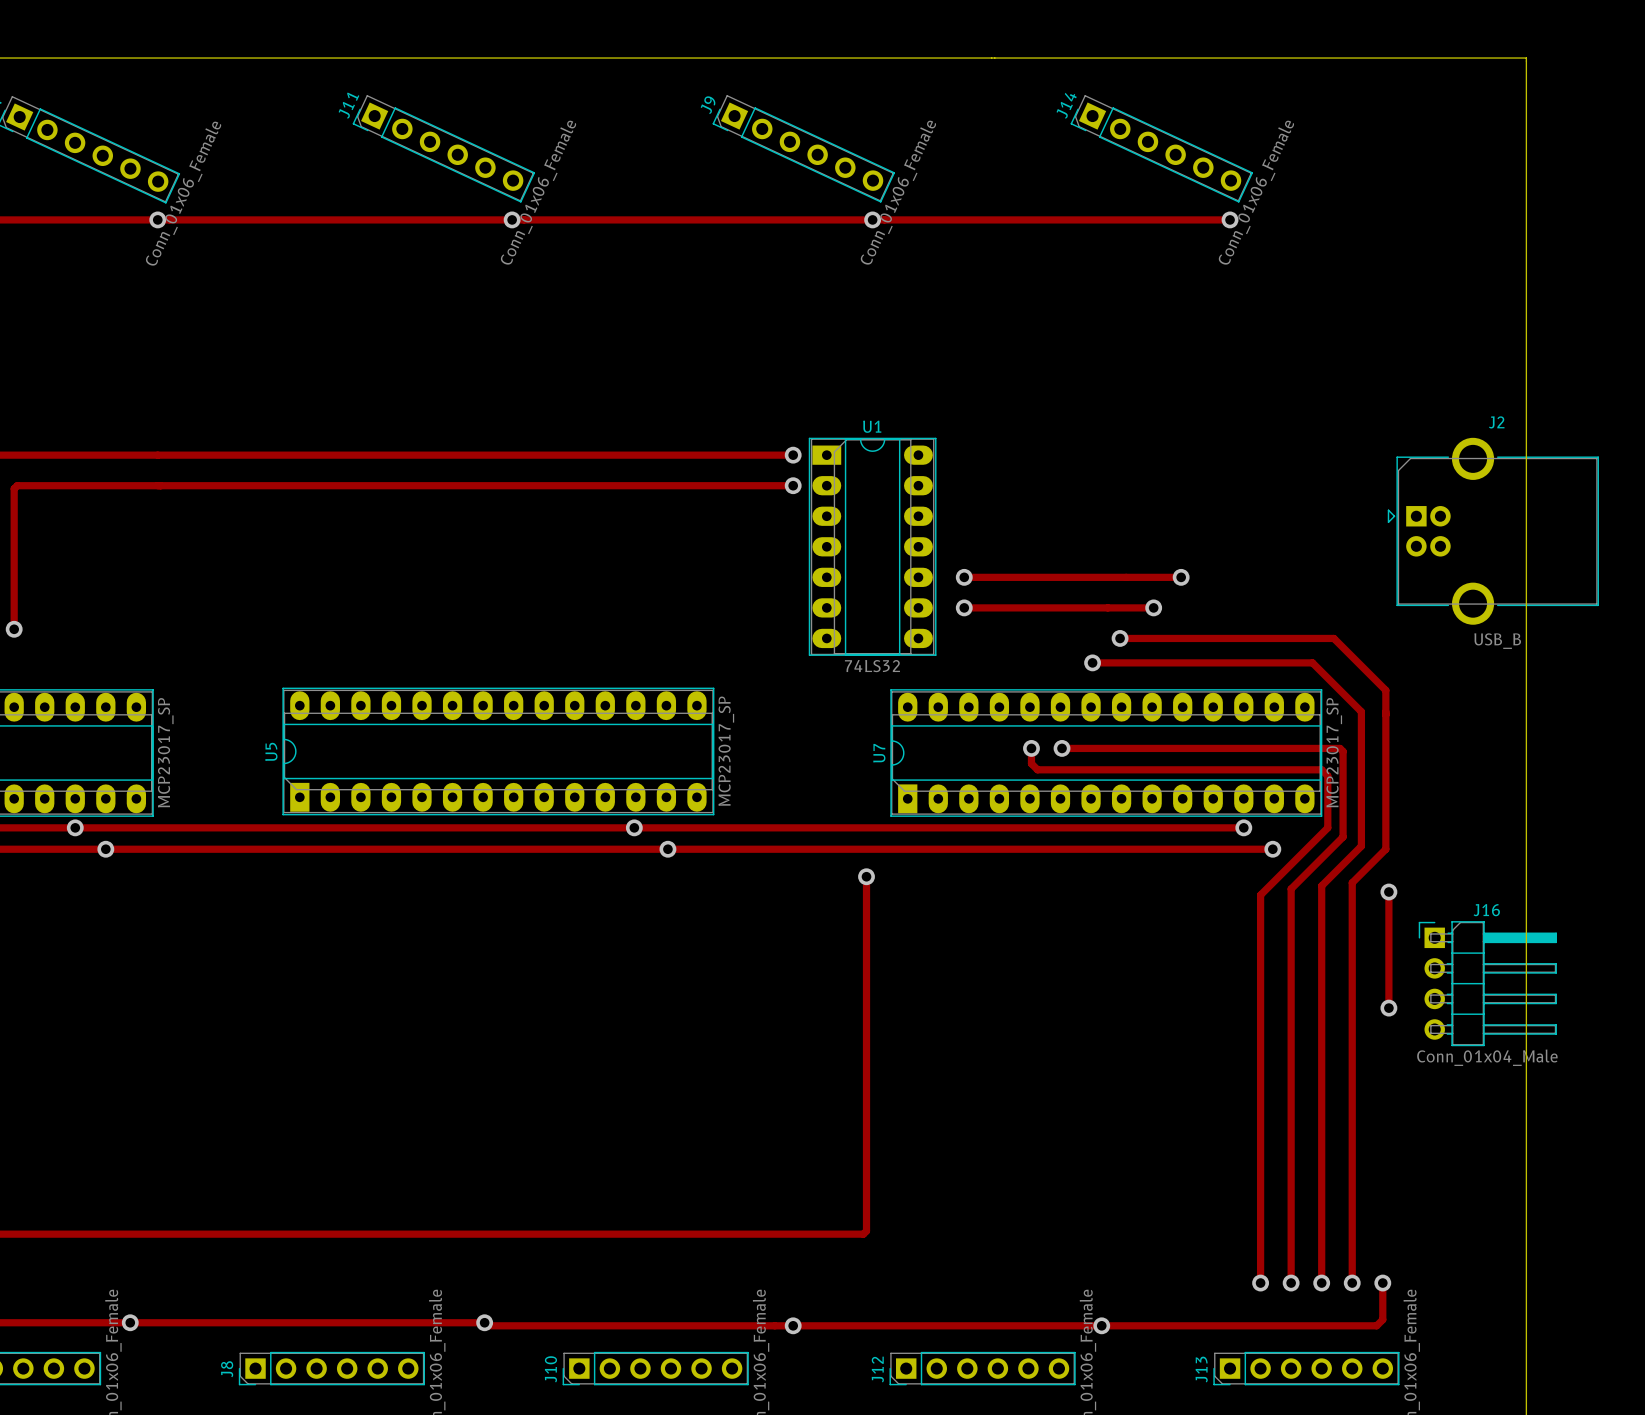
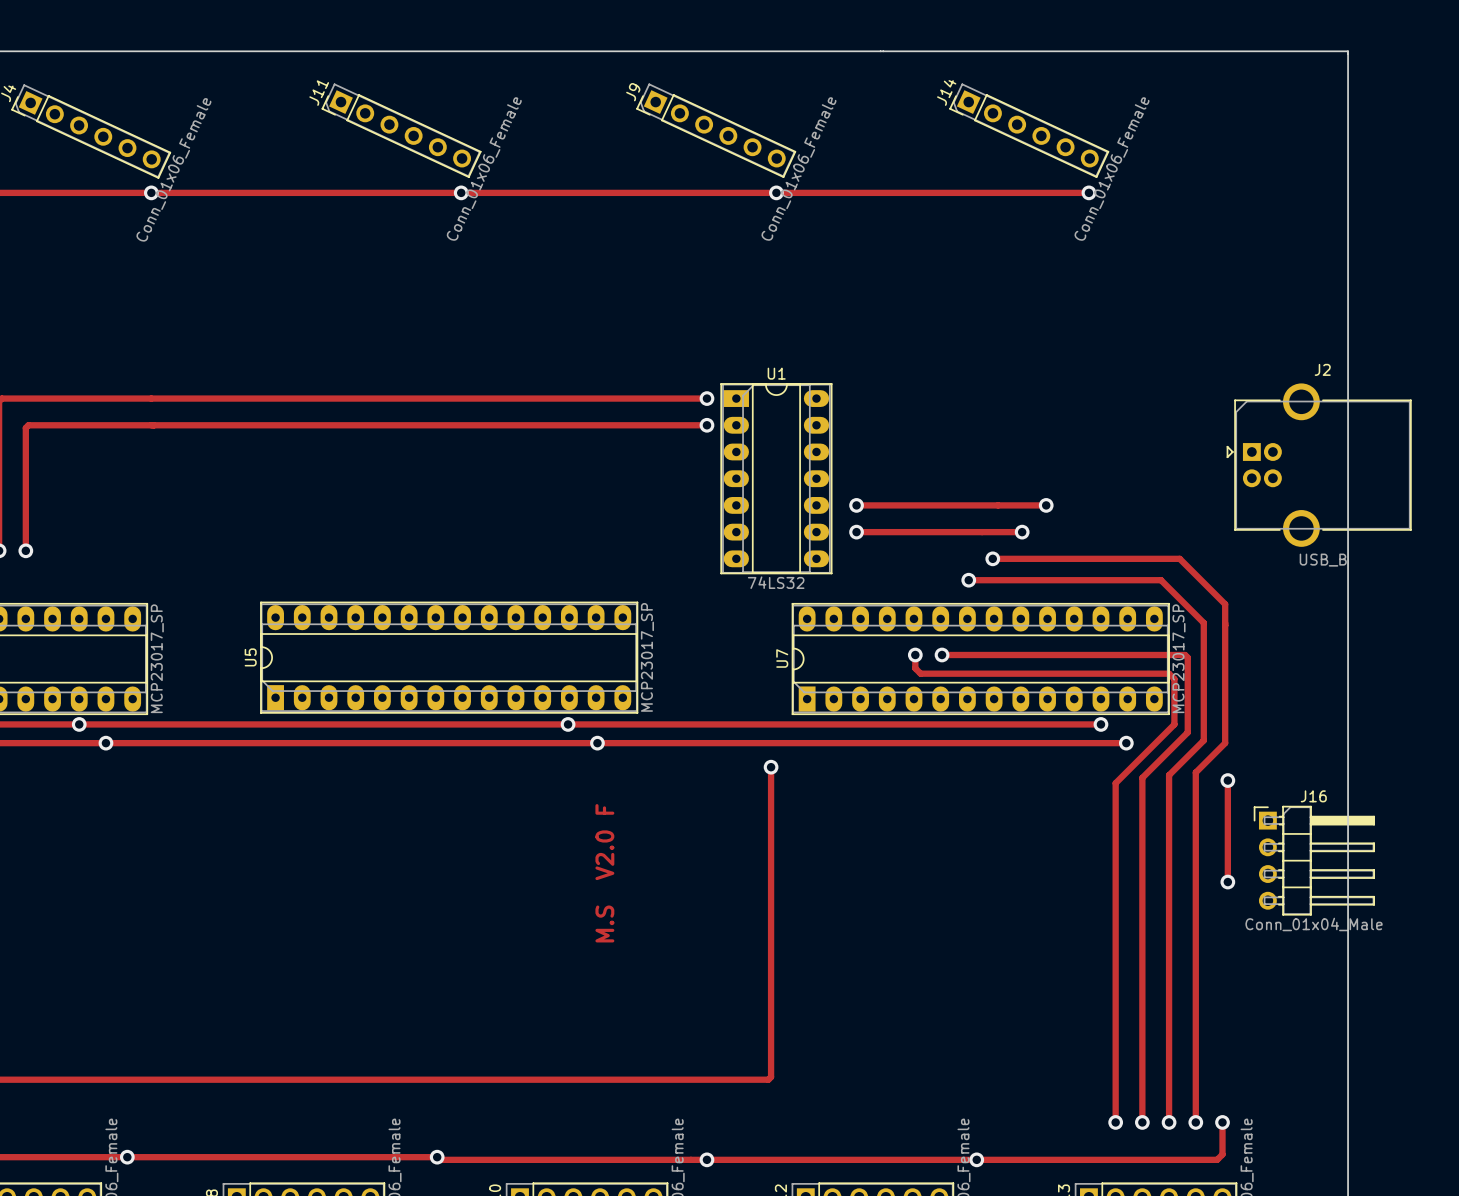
text: none -> M.S V2.0 F (604, 873)

